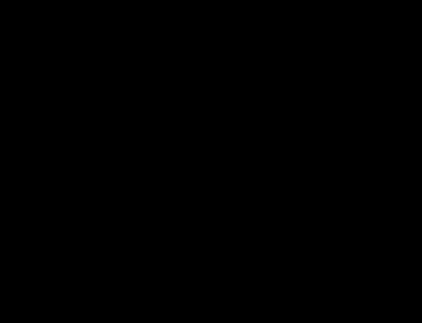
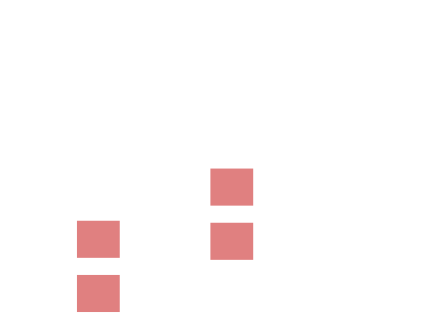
part: none -> (231, 214)
part: none -> (98, 266)

